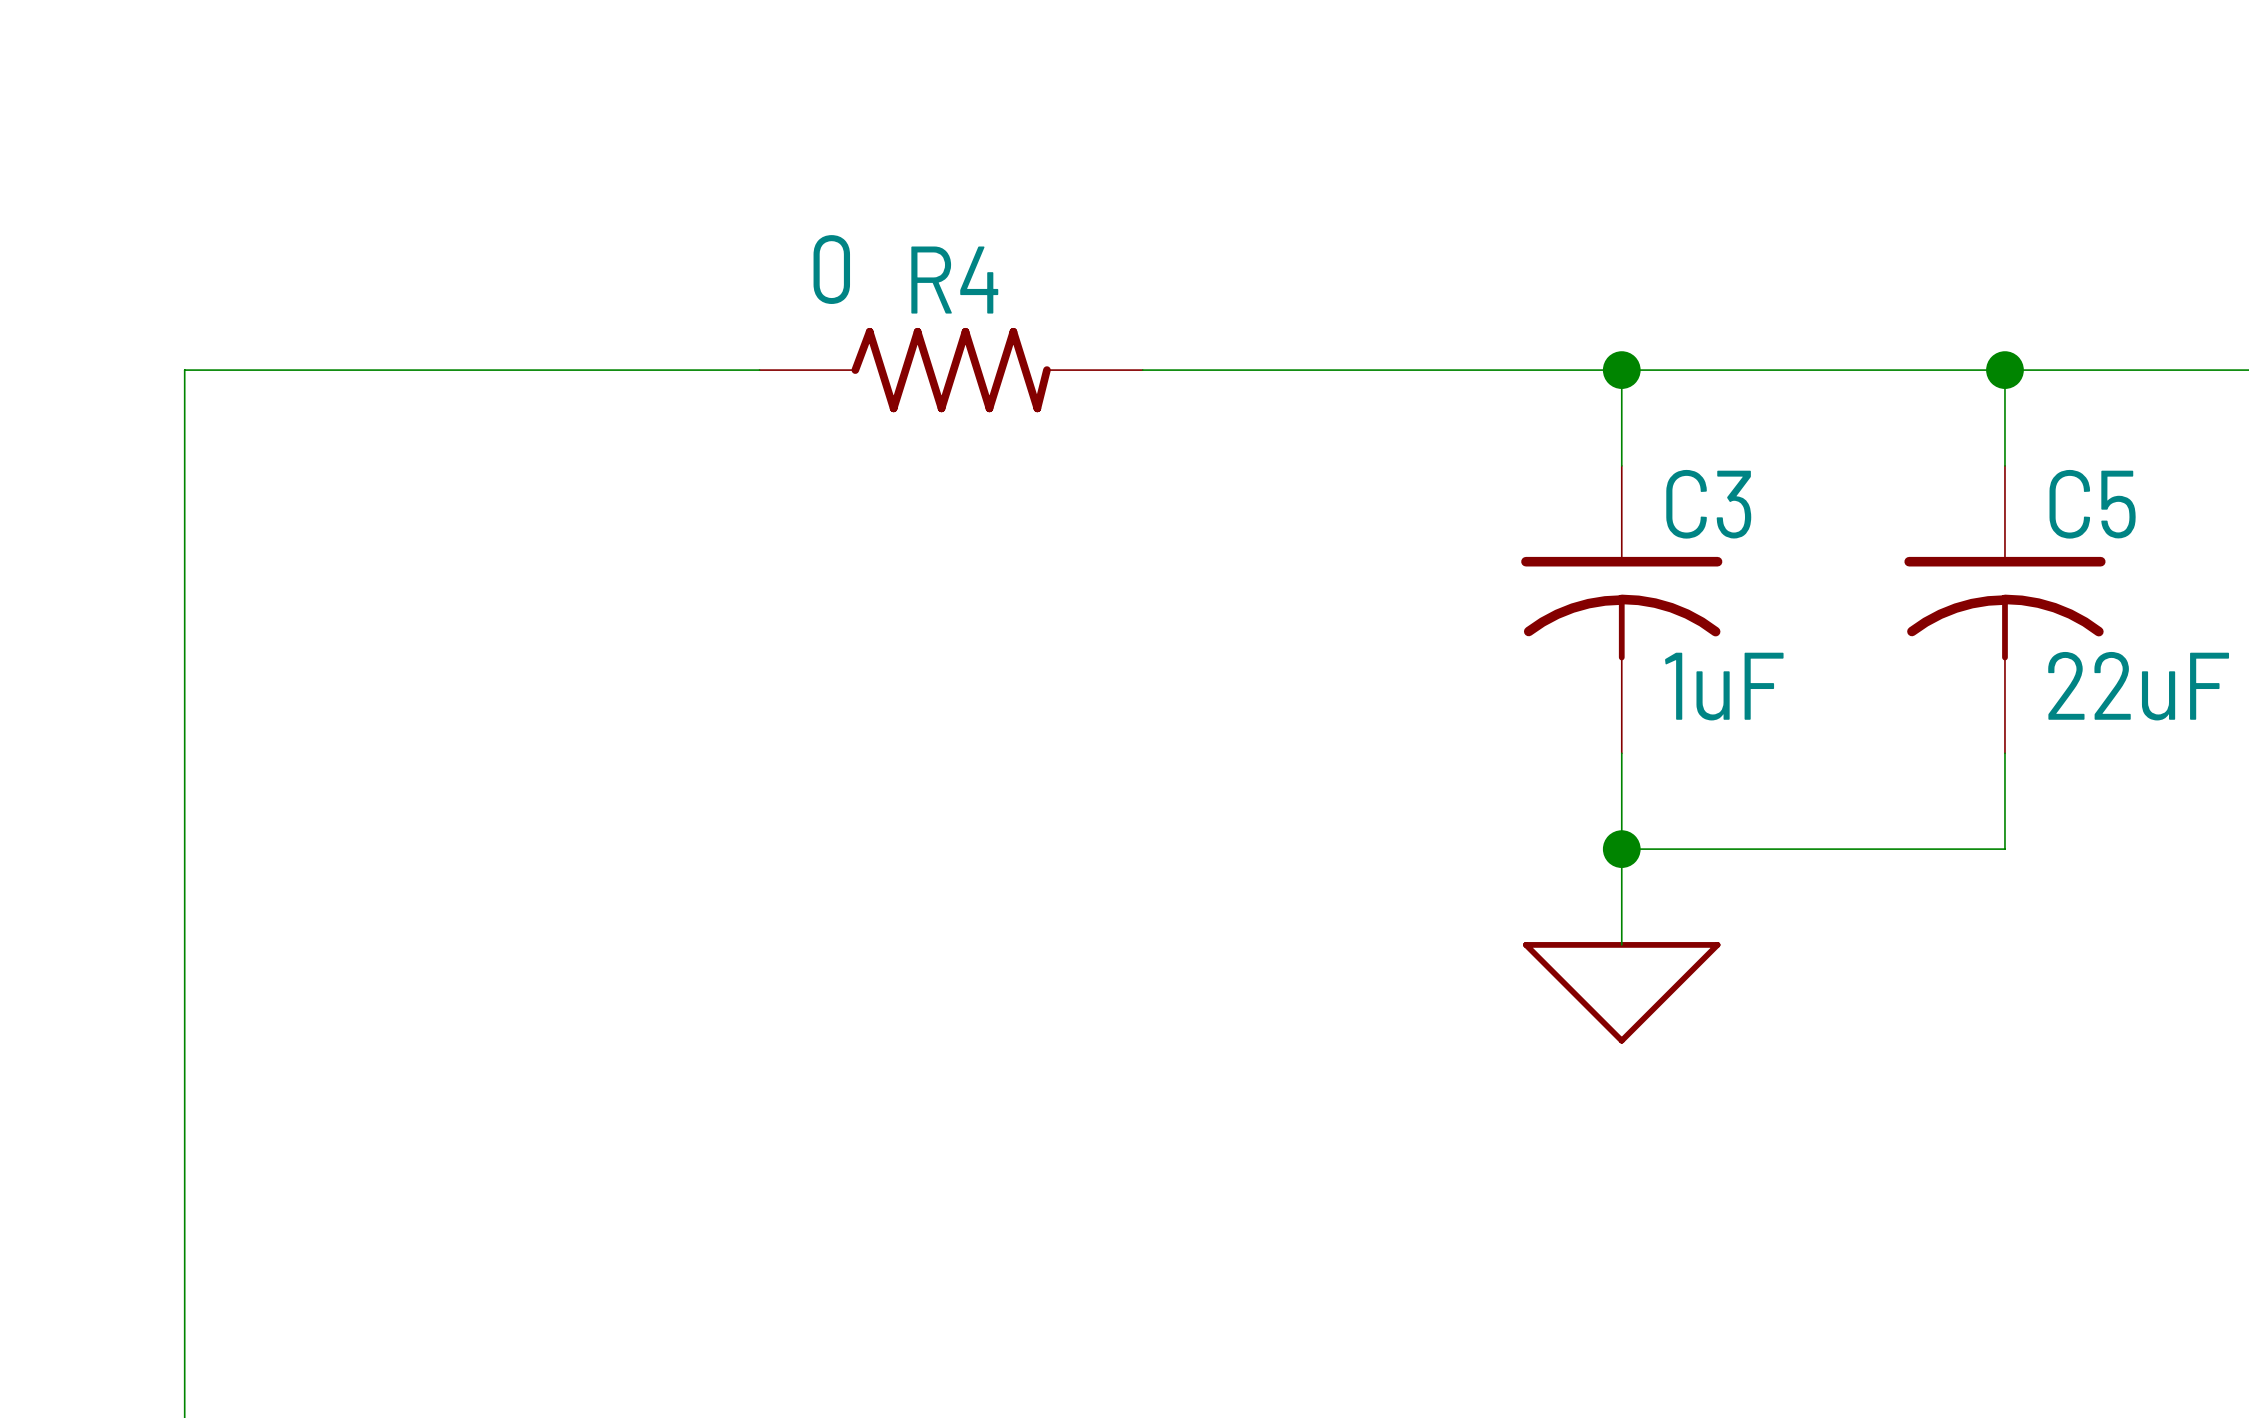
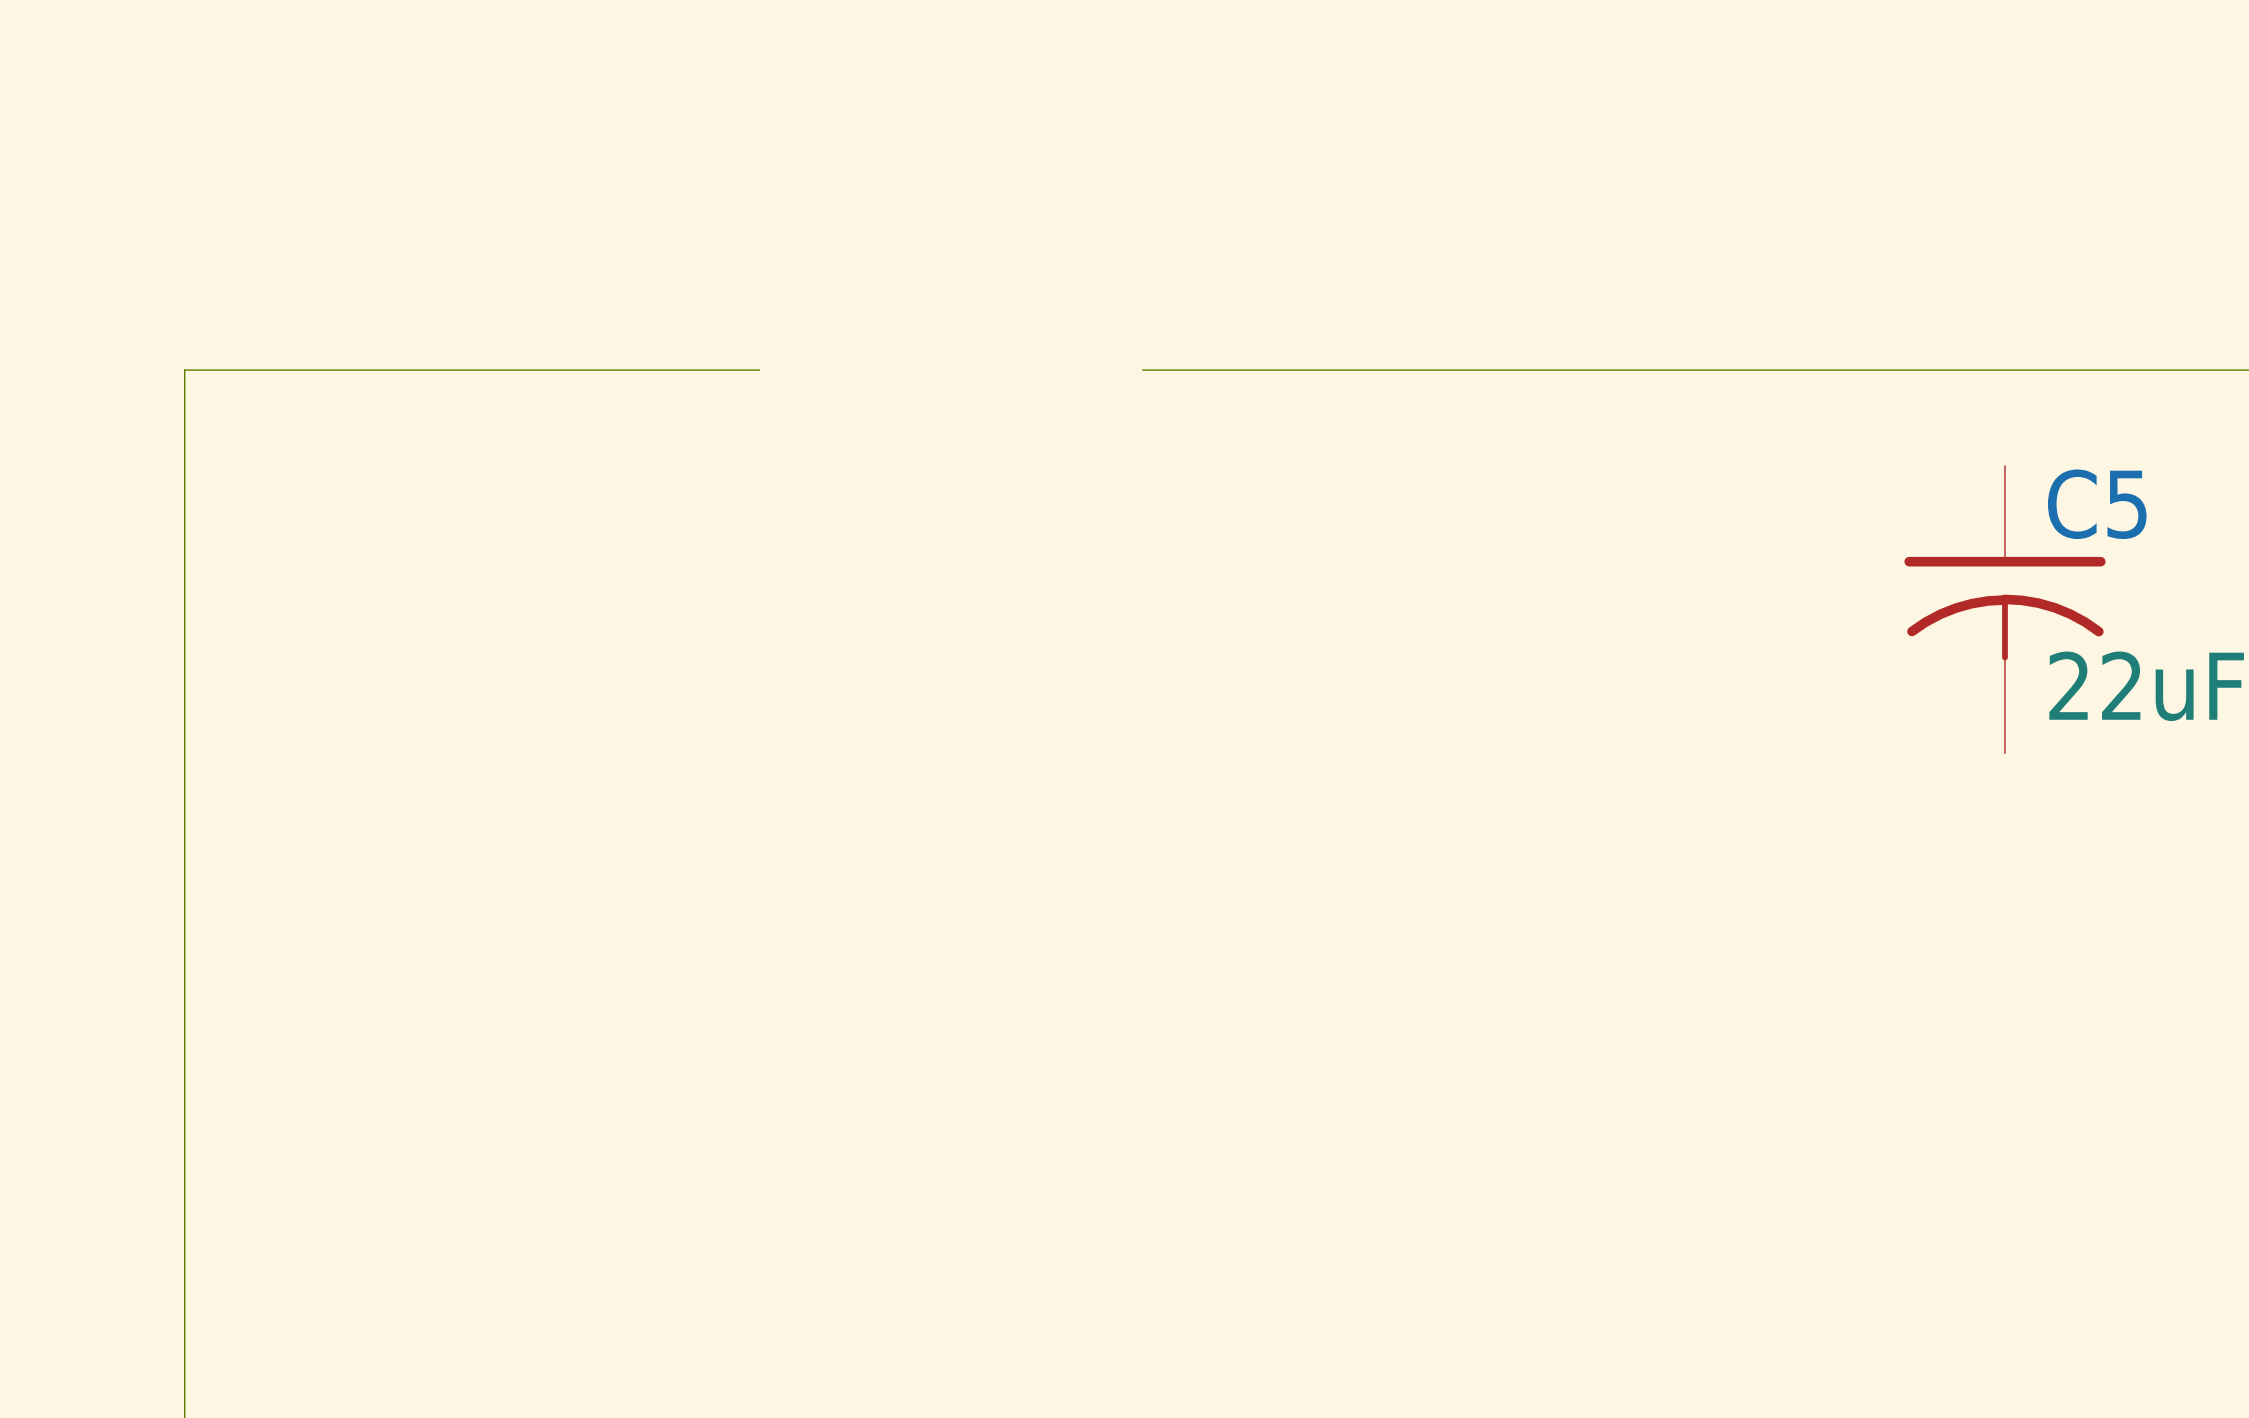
R4: 0 (951, 370) -> none
wire: (1621, 370) (1621, 465) -> none
junction: (1621, 370) -> none
wire: (2004, 370) (2004, 465) -> none
junction: (2004, 370) -> none
C3: 1uF (1621, 609) -> none
wire: (1621, 753) (1621, 944) -> none
wire: (2004, 753) (2004, 849) (1621, 849) -> none
junction: (1621, 849) -> none
power symbol: (1621, 992) -> none

